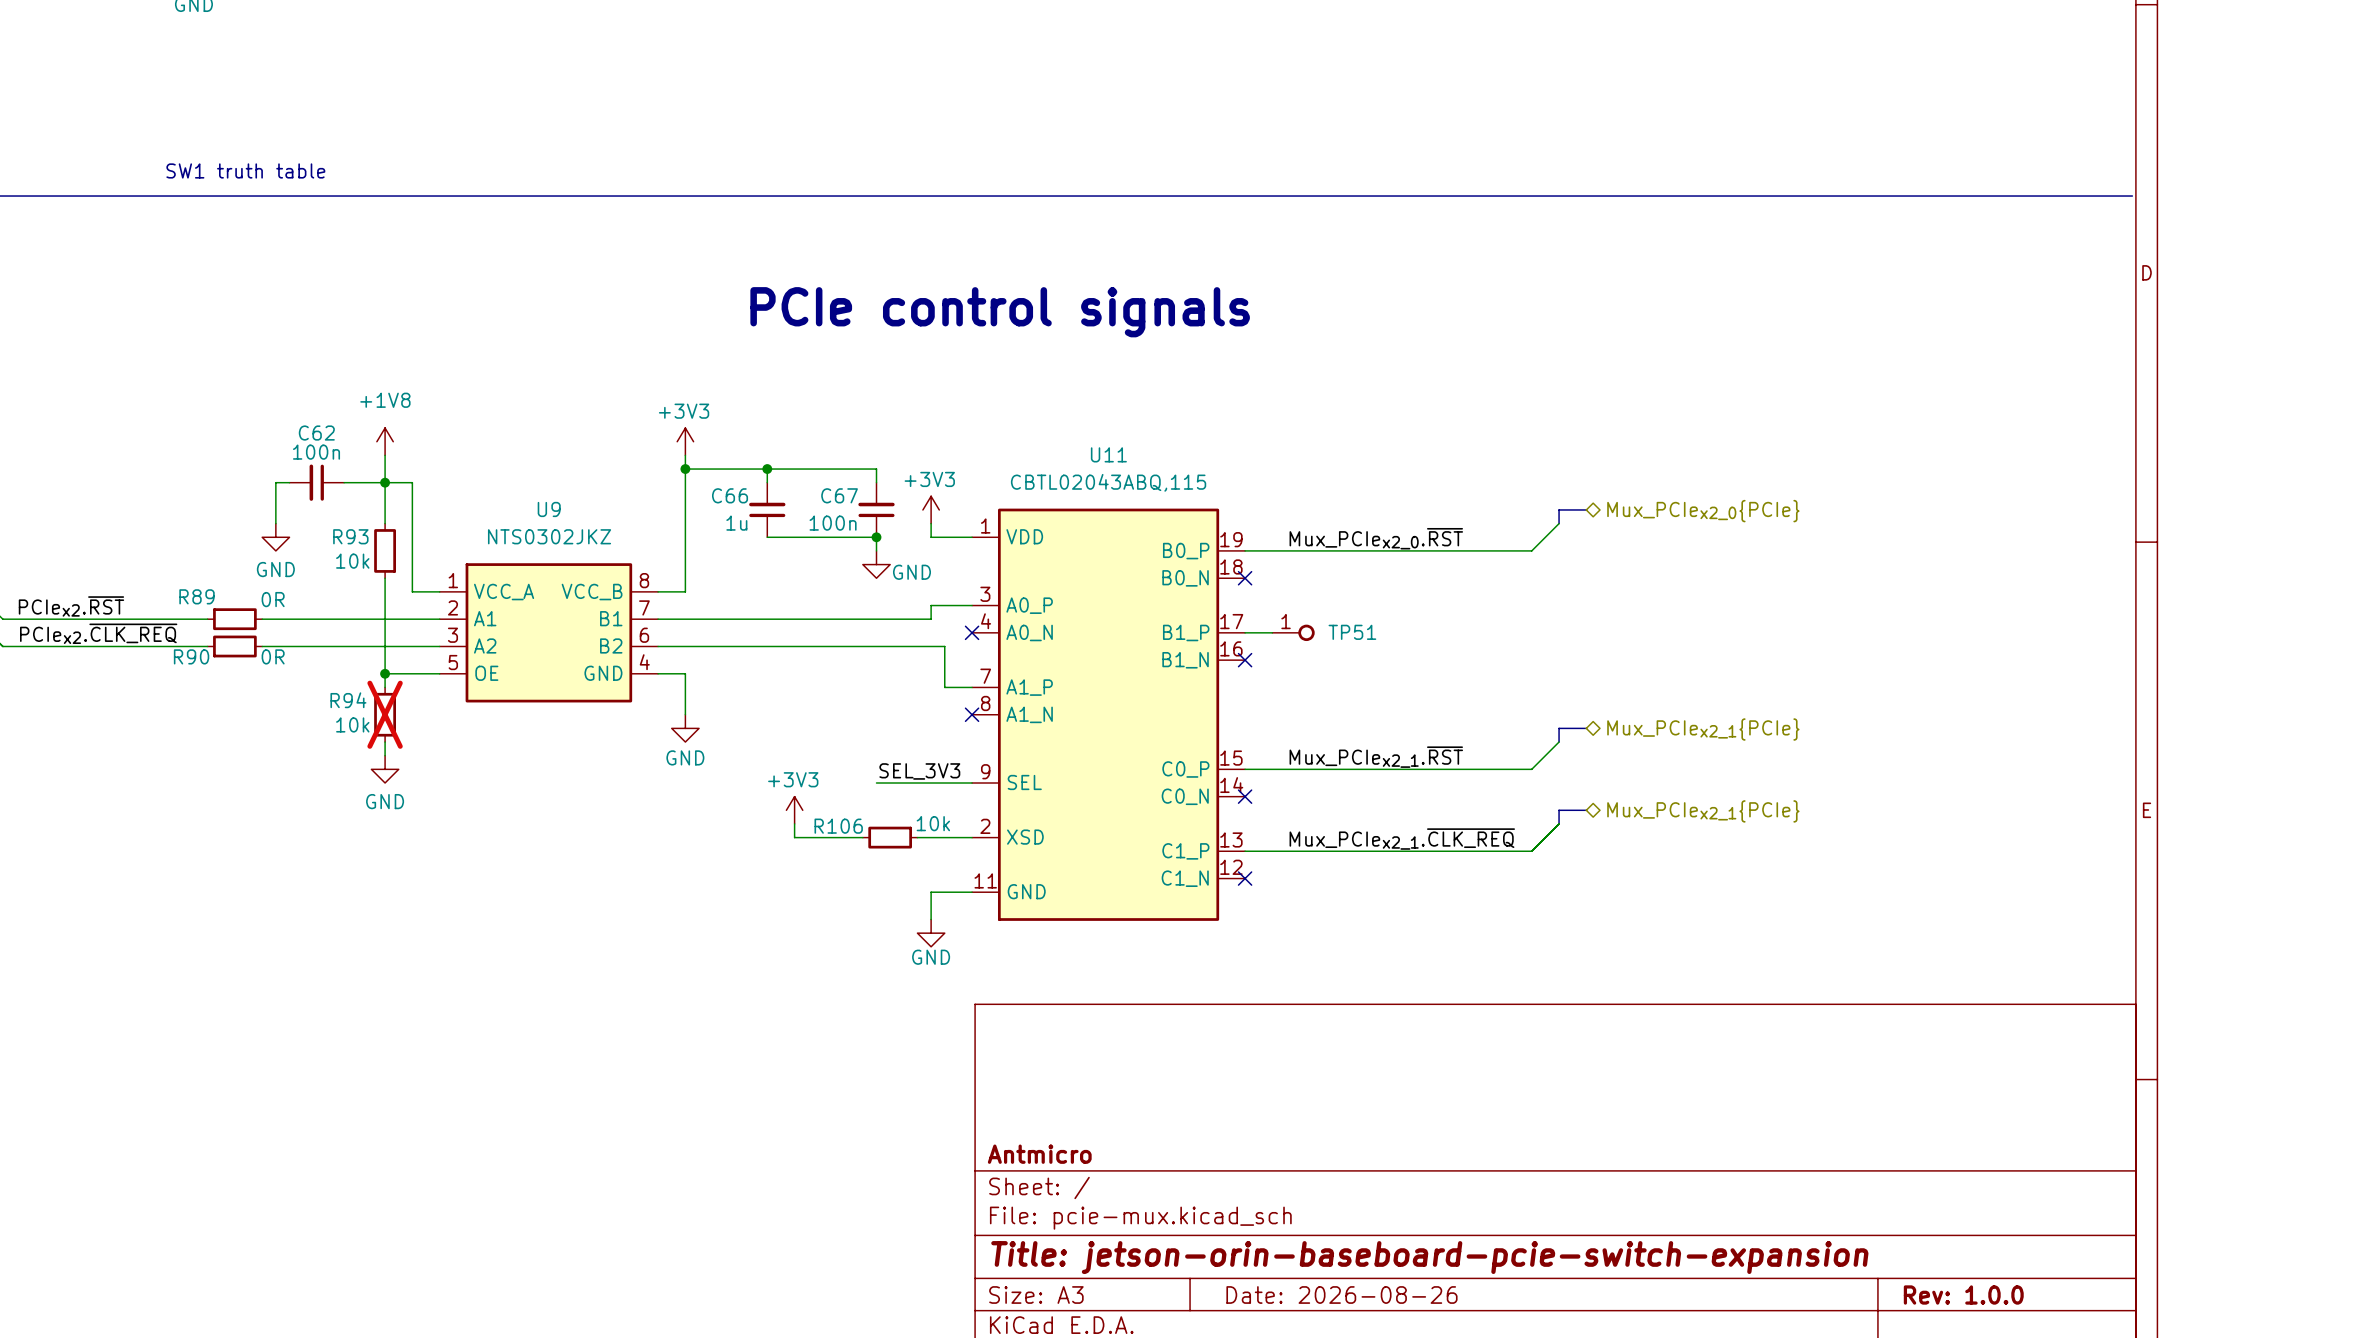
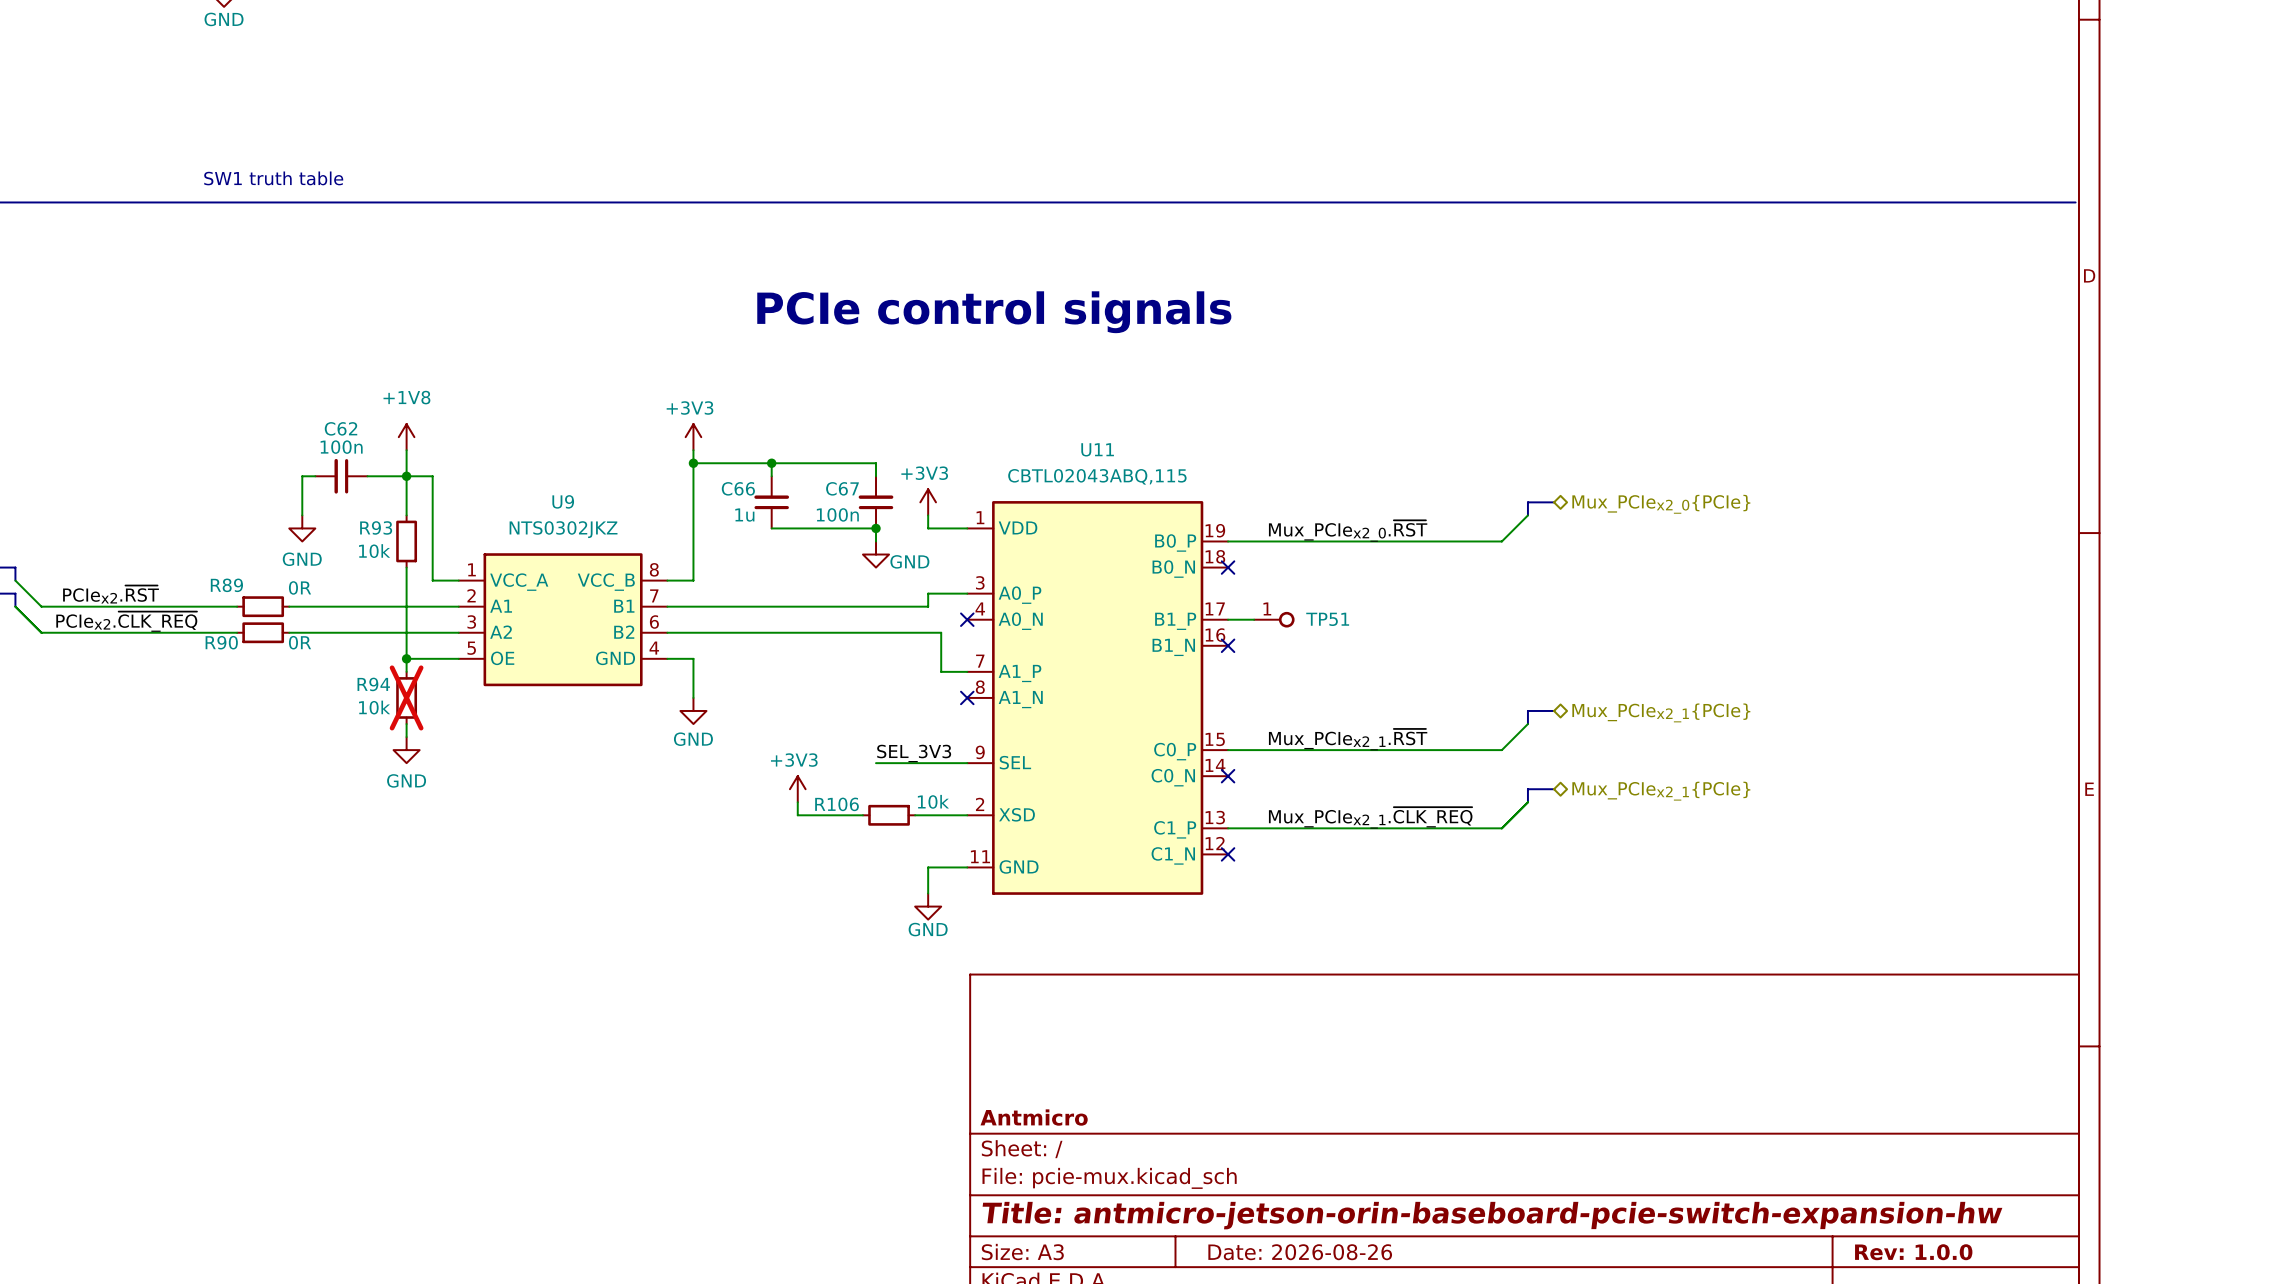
title block: Title: jetson-orin-baseboard-pcie-switch-expansion (1429, 1257) -> Title: antmicro-jetson-orin-baseboard-pcie-switch-expansion-hw (1492, 1215)

